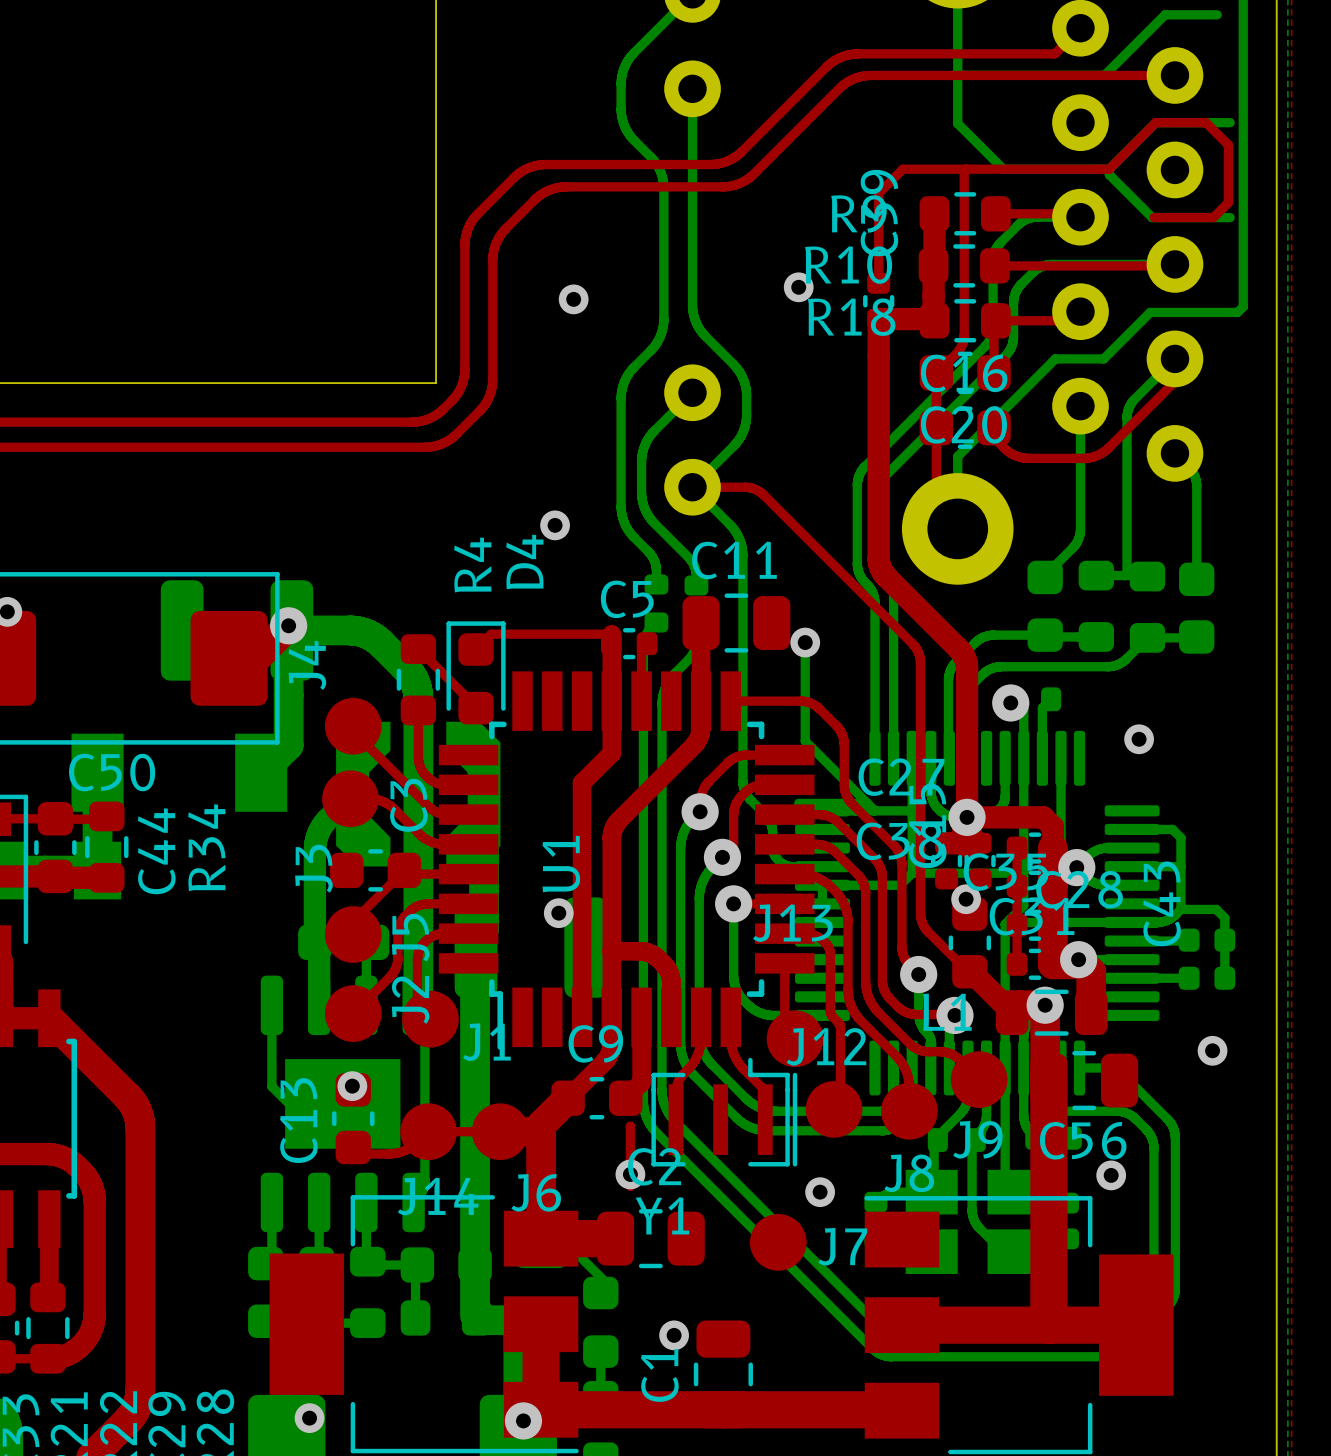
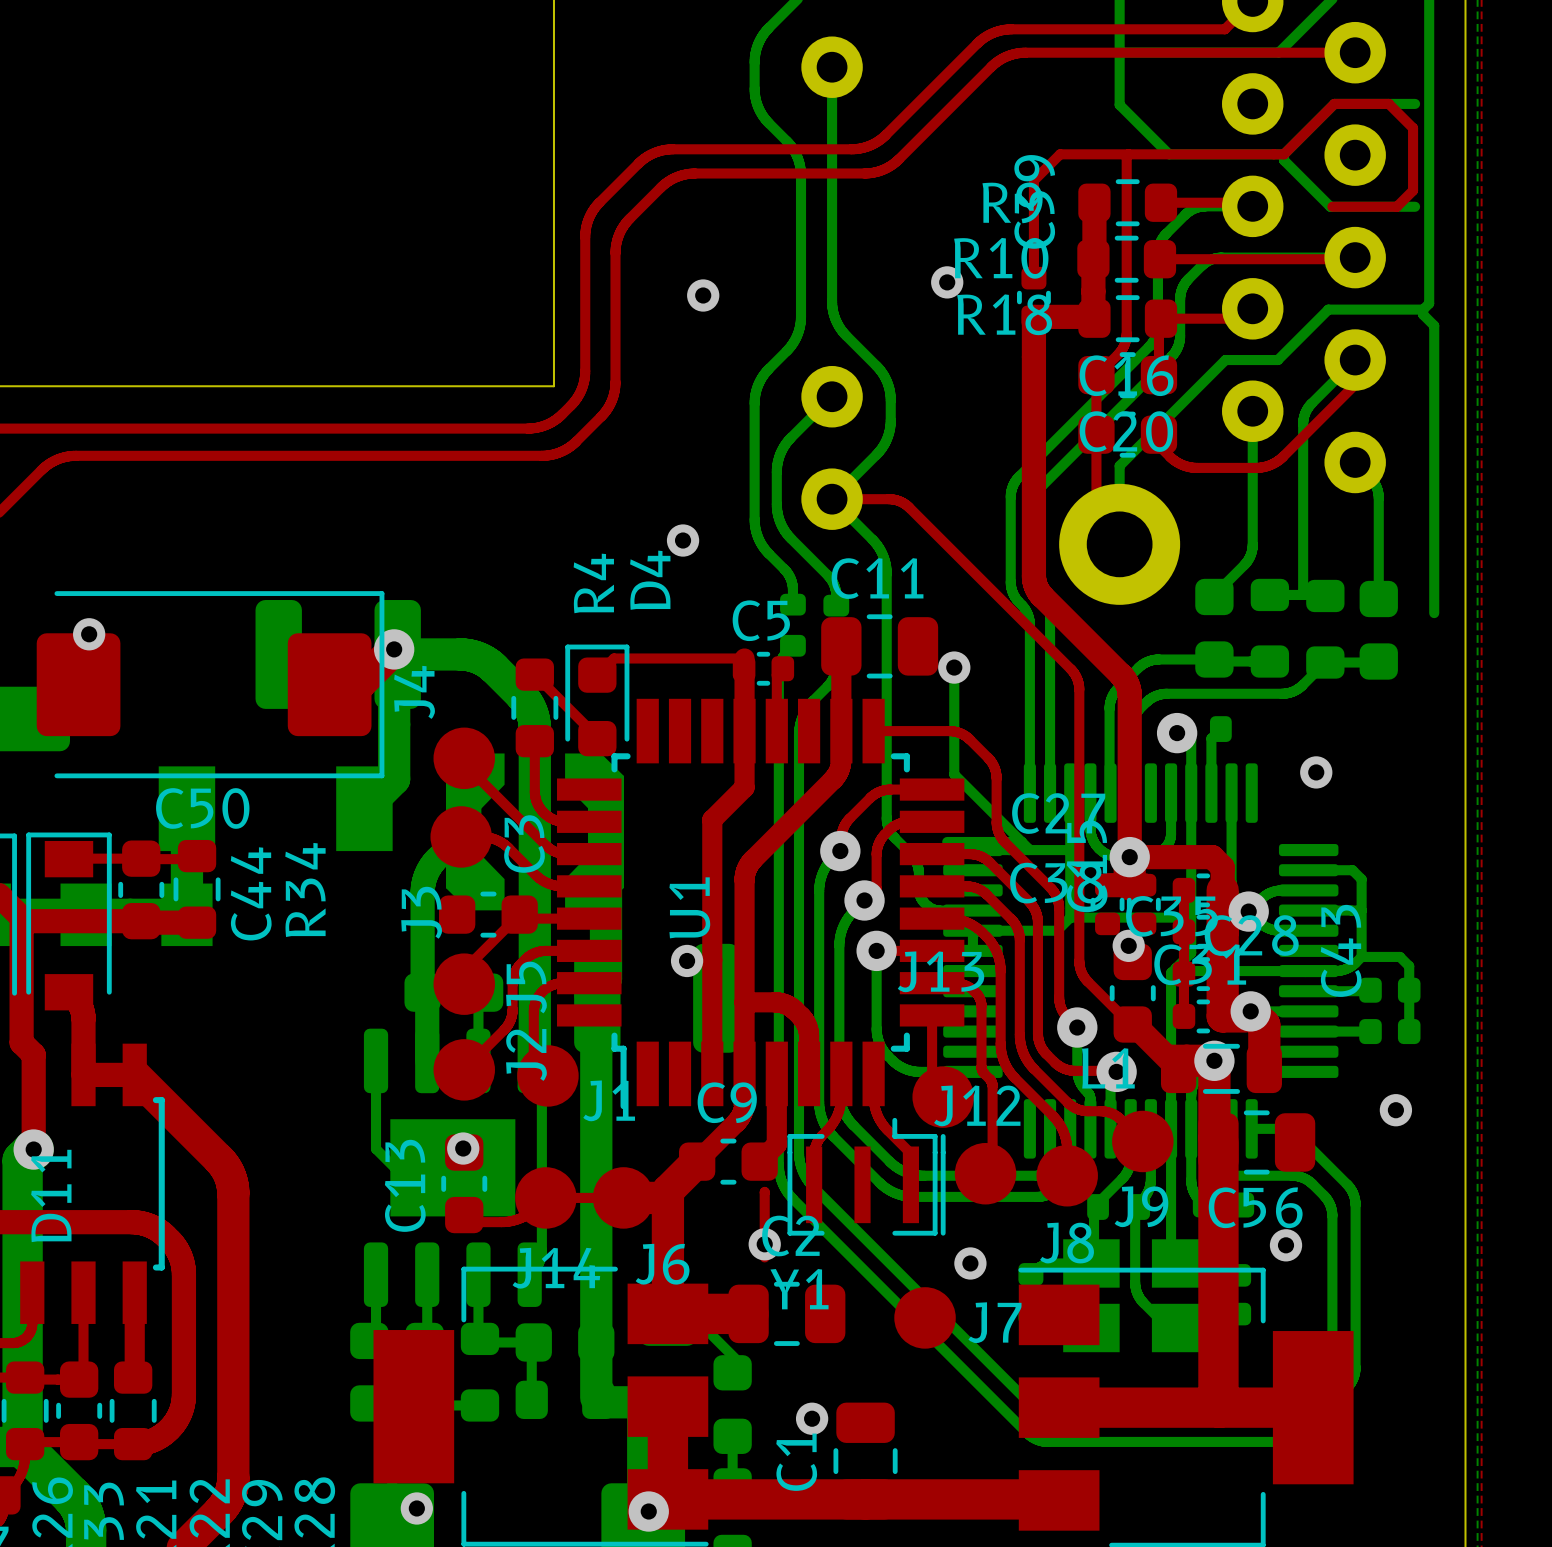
bottom track: none -> (1423, 309) (1423, 314) (1434, 325) (1434, 613)

